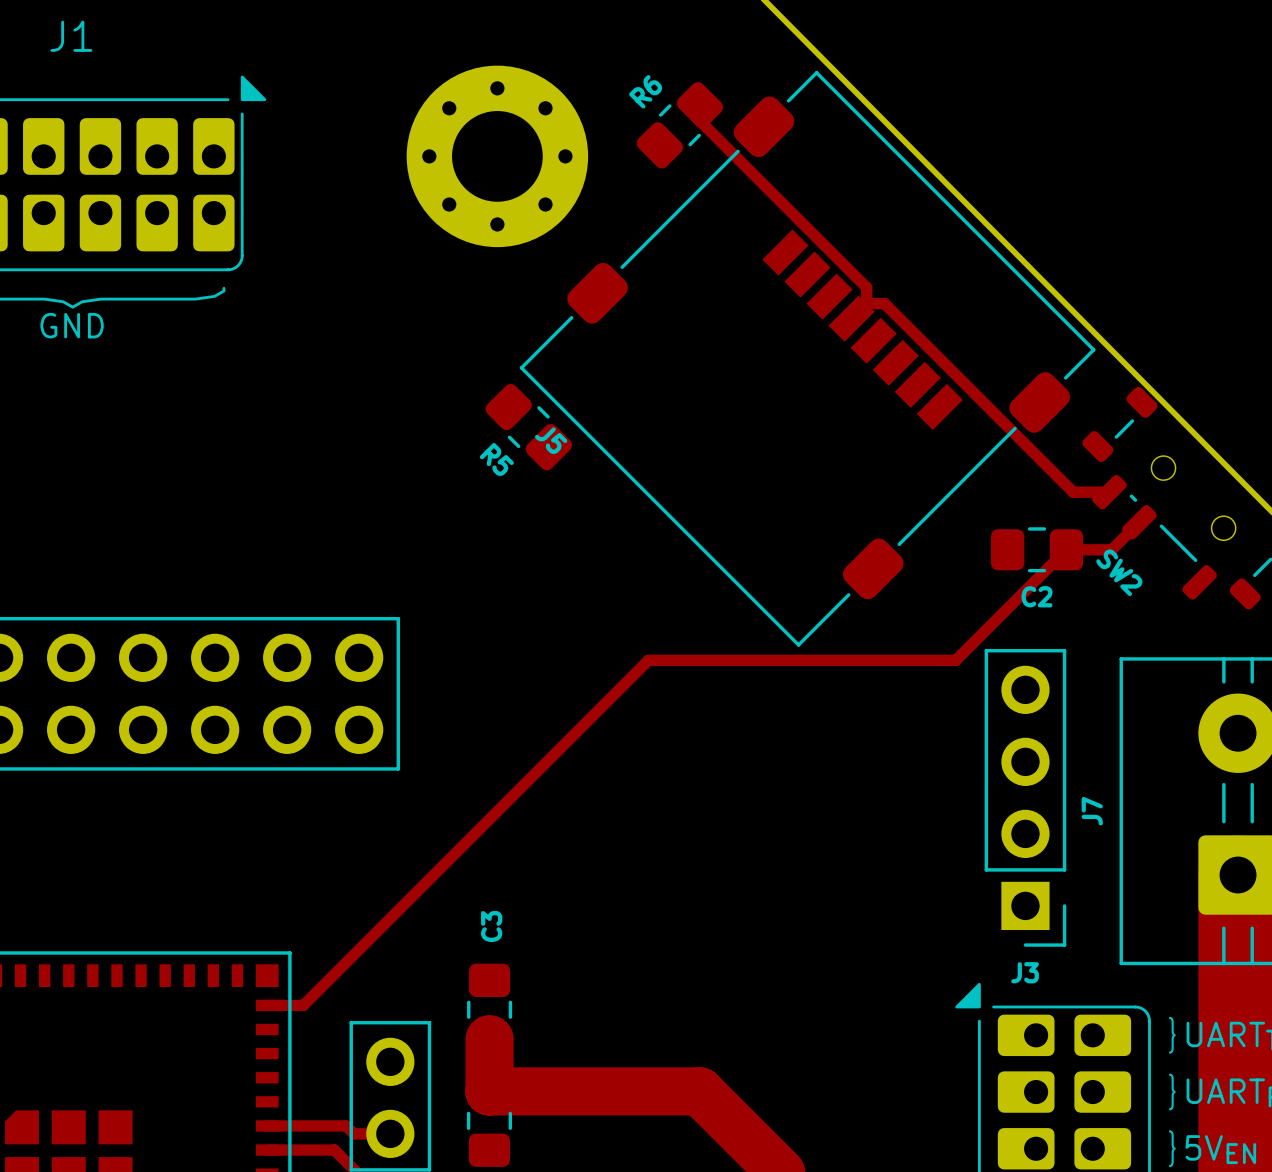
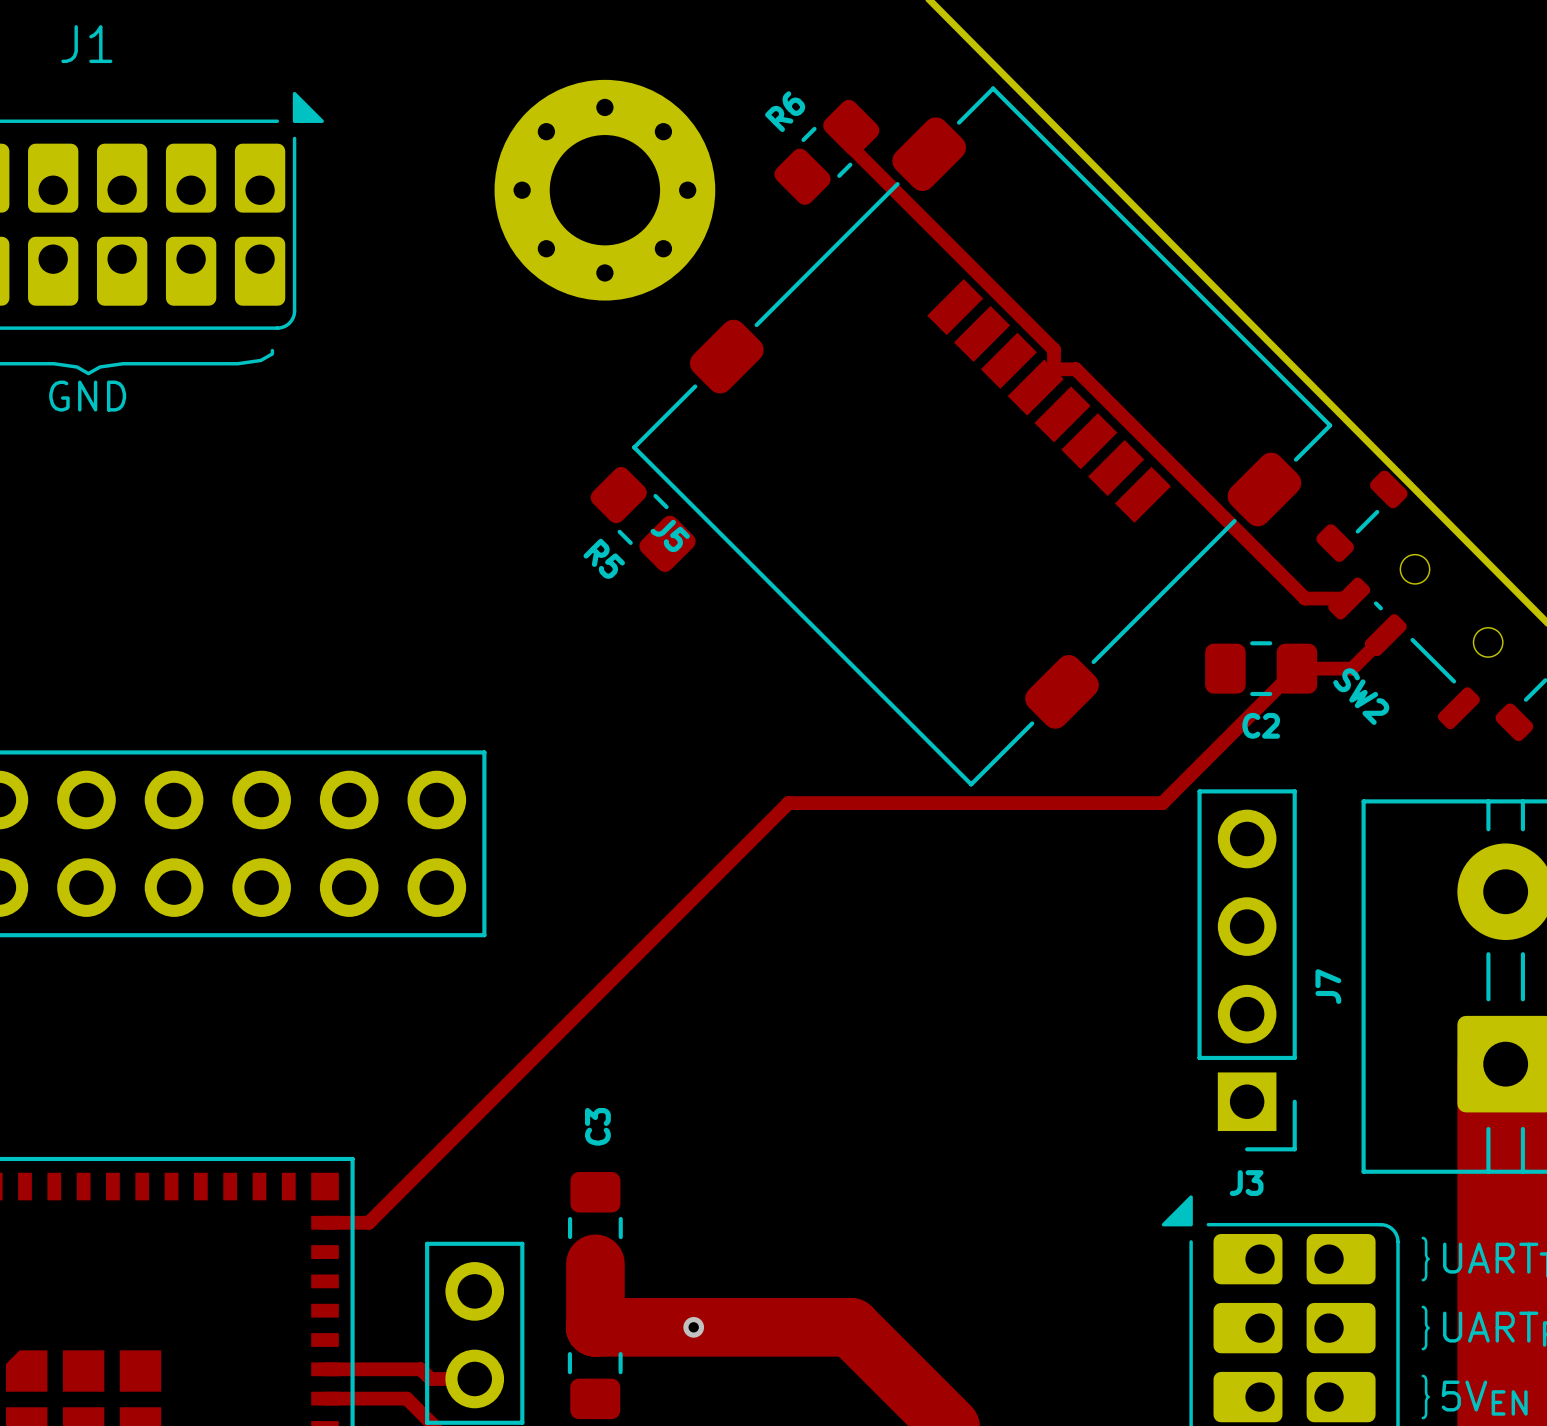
via: none -> (693, 1327)

